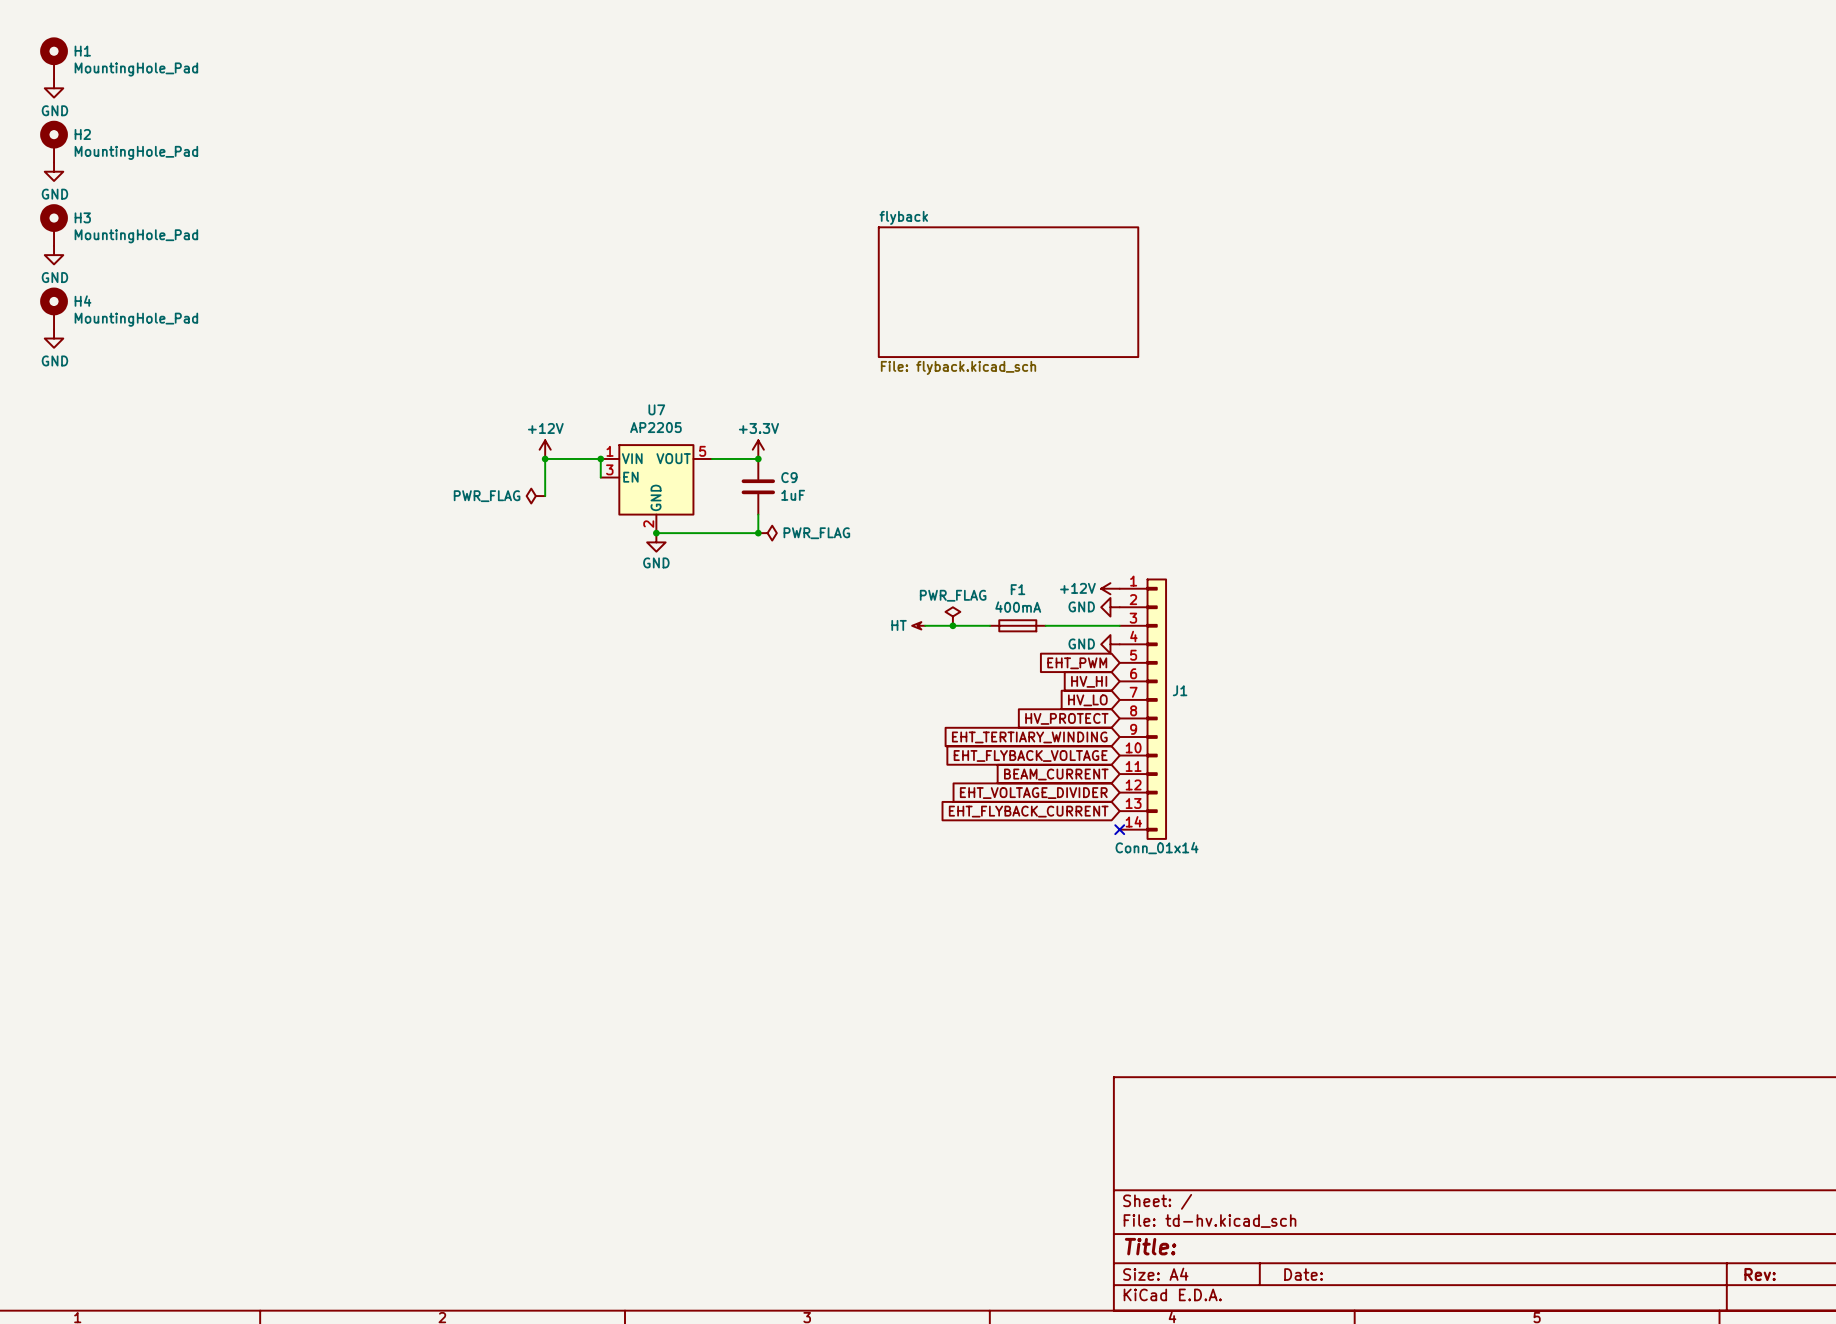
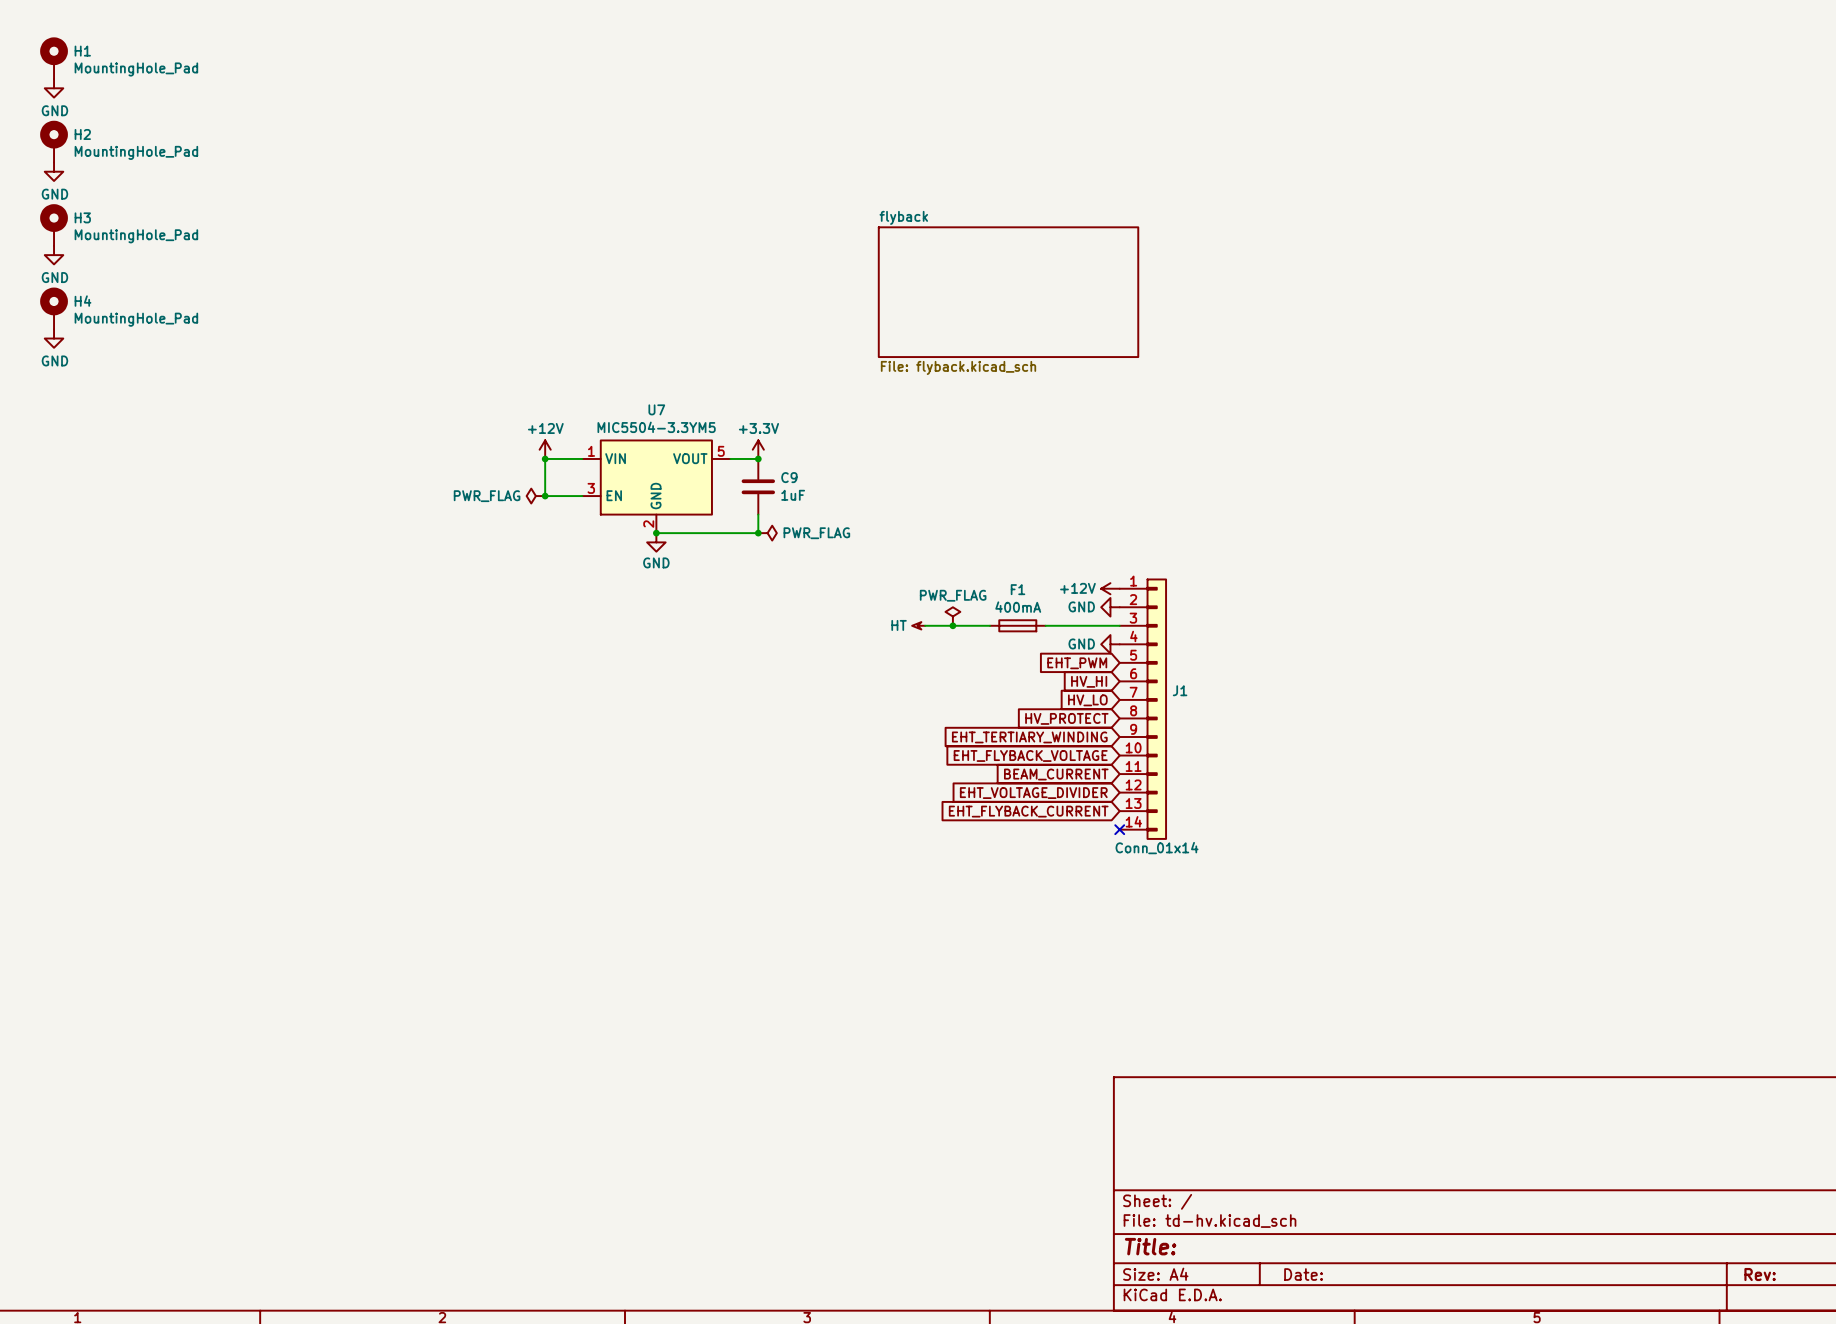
U7 value: AP2205 (655, 427) -> MIC5504-3.3YM5 (656, 427)
U7 symbol: [600, 444, 712, 534] -> [582, 439, 731, 534]
junction: (600, 458) -> none
wire: none -> (545, 496) (582, 496)
junction: none -> (545, 496)

